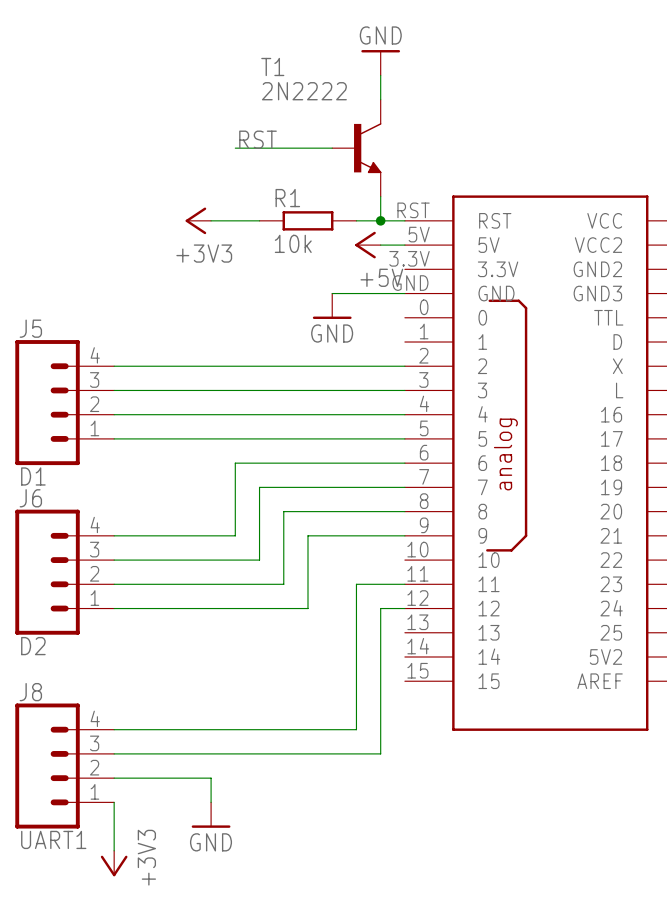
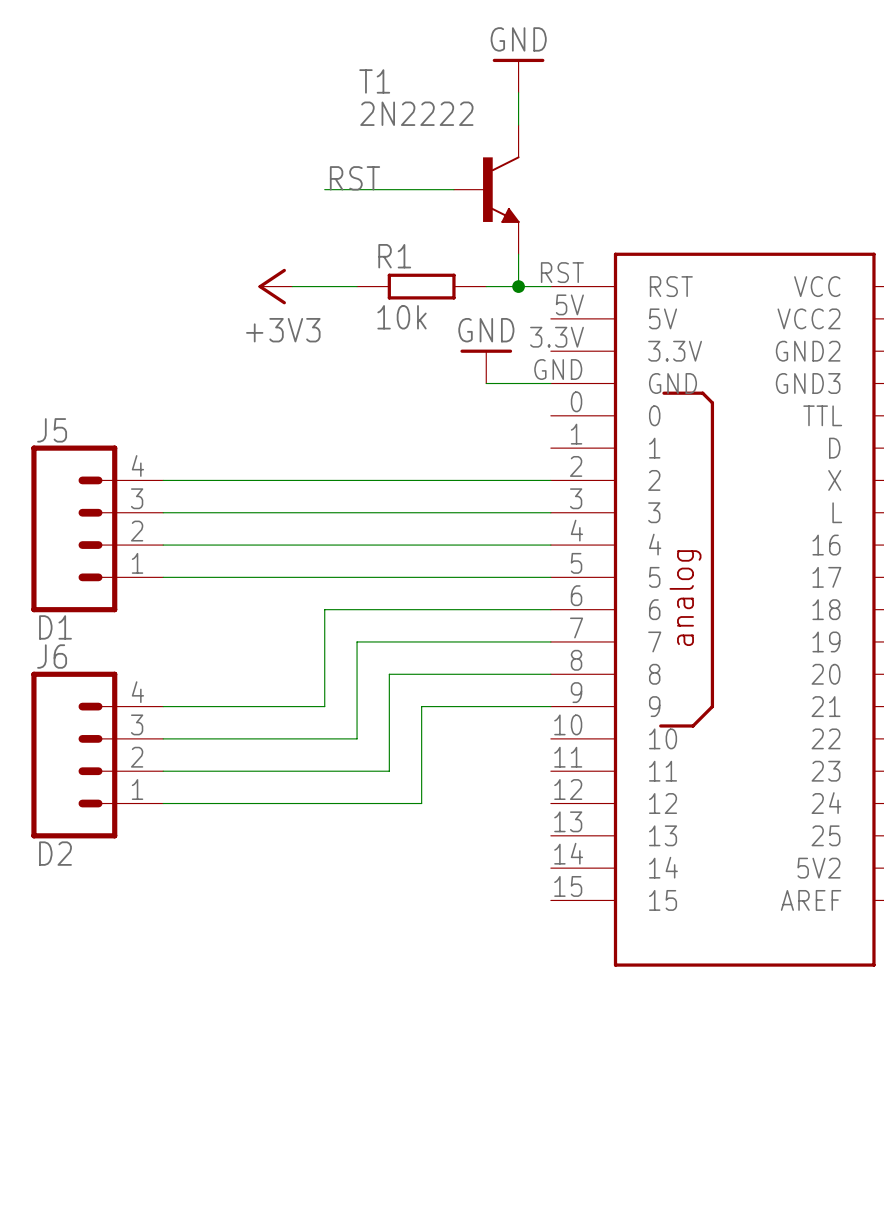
power symbol: +5V (367, 245) -> none
wire: (380, 245) (404, 245) -> none
wire: (332, 293) (356, 293) -> none
power symbol position: GND (332, 306) -> GND (486, 366)
power symbol rotation: 0° (332, 317) -> 180° (486, 351)
wire: (404, 584) (356, 584) (356, 729) (114, 729) -> none
wire: (404, 608) (380, 608) (380, 753) (114, 753) -> none
J8: UART1 (64, 766) -> none
wire: (114, 778) (211, 778) (211, 802) -> none
wire: (114, 802) (114, 850) -> none
power symbol: GND (211, 815) -> none
power symbol: +3V3 (114, 863) -> none

